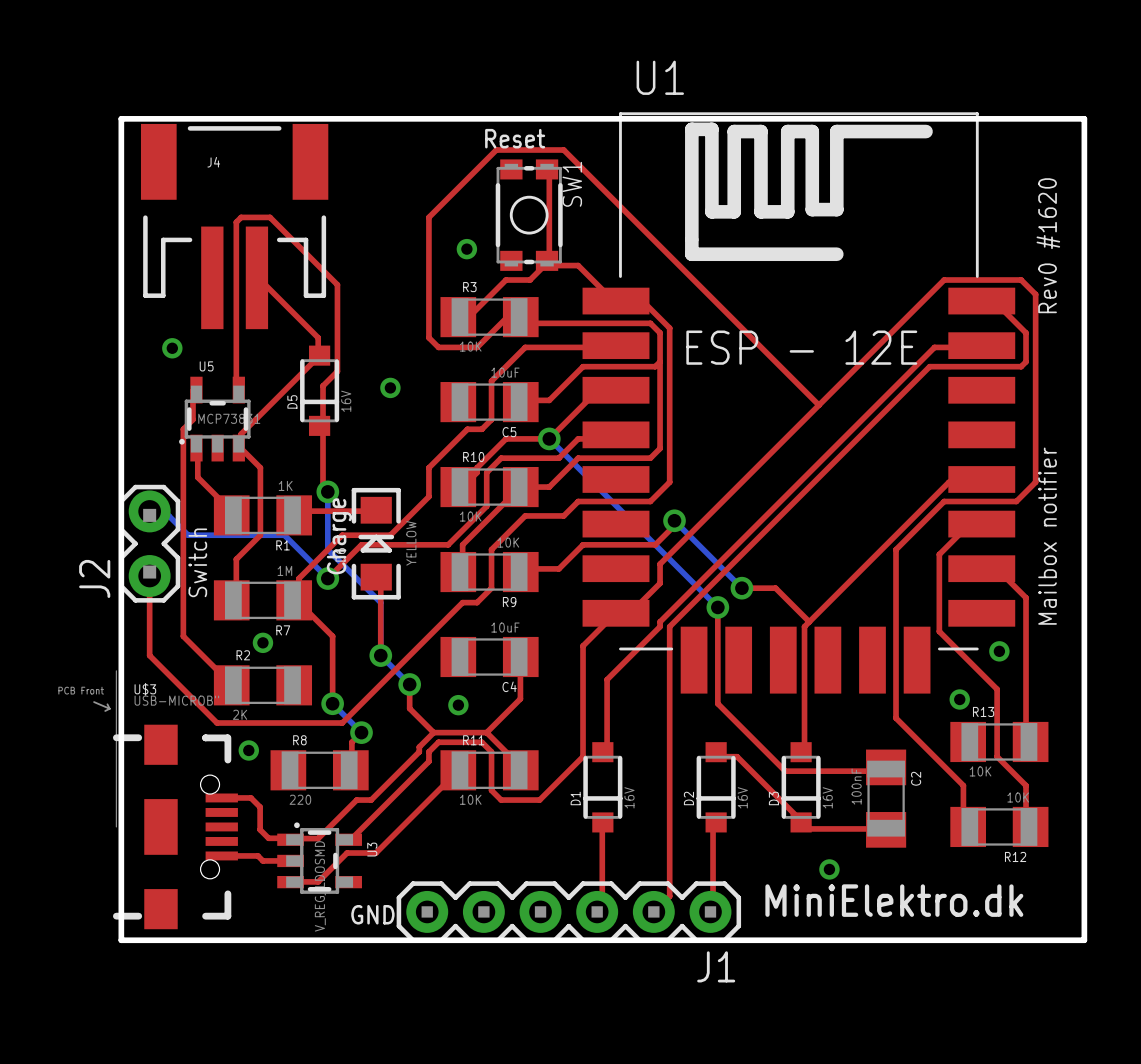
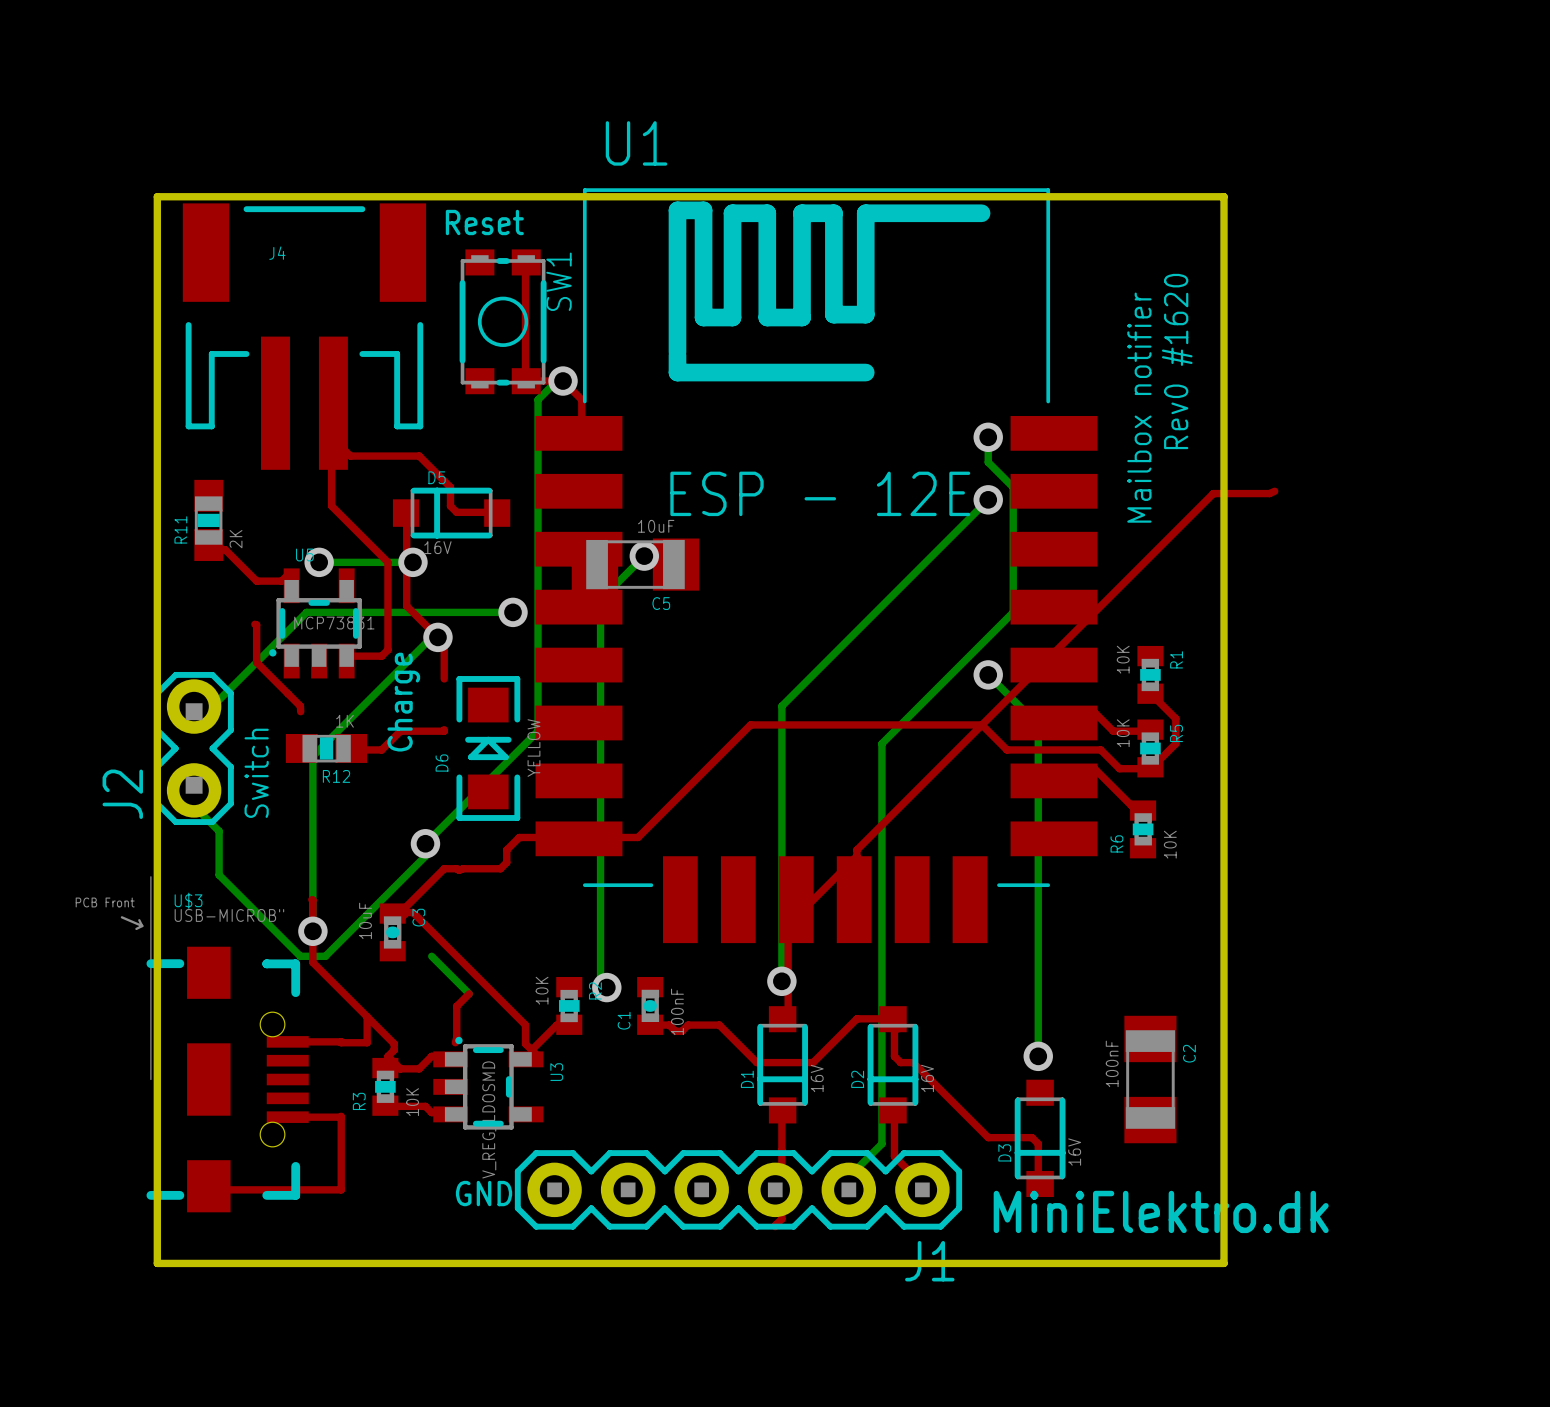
board edge: (942, 118) (1084, 118) (1084, 940) (942, 940) -> (1224, 196) (1224, 1263)
text position: Reset (515, 138) -> Reset (484, 222)
top track: none -> (526, 262) (525, 381) (563, 381) (581, 399) (581, 431) (579, 433)
top track: (547, 169) (549, 174) (549, 260) (547, 260) -> none
SW1 position: (529, 215) -> (503, 321)
text position: Rev0 #1620 (1048, 245) -> Rev0 #1620 (1177, 361)
via: (466, 249) -> none
bottom track: none -> (563, 381) (556, 381) (538, 399) (538, 731) (425, 843) (425, 856) (325, 956) (300, 956) (219, 875) (219, 831) (194, 806) (194, 790)
via: none -> (563, 381)
top track: (547, 260) (549, 265) (578, 265) (611, 299) (616, 301) (616, 304) (645, 304) (669, 328) (669, 482) (650, 501) (578, 501) (563, 515) (525, 515) (491, 549) (491, 588) (477, 602) (462, 602) (342, 723) (217, 723) (149, 655) (149, 576) -> none
top track: (547, 260) (530, 280) (505, 280) (472, 313) (462, 313) (458, 317) -> none
top track: none -> (333, 403) (344, 449) (331, 462) (331, 506) (387, 562) (387, 649) (381, 656) (350, 656) (346, 661)
top track: (260, 280) (318, 337) (319, 355) (241, 434) (241, 443) (238, 448) (260, 467) (260, 535) (236, 559) (236, 597) (231, 600) -> (337, 406) (337, 443) (350, 456) (419, 456) (450, 487) (450, 506) (456, 512) (497, 513)
R3 footprint: [440, 297, 539, 338] -> [372, 1057, 399, 1116]
top track: (981, 301) (982, 304) (997, 304) (1026, 332) (1026, 361) (1021, 366) (929, 366) (669, 626) (669, 896) (653, 911) -> none
bottom track: none -> (988, 437) (988, 462) (1013, 487) (1013, 612) (881, 743) (881, 1143) (850, 1175) (850, 1187) (848, 1189)
via: none -> (988, 437)
top track: (616, 345) (611, 347) (525, 347) (491, 381) (491, 419) (481, 429) (467, 429) (428, 467) (428, 496) (390, 535) (342, 535) (298, 578) (298, 597) (294, 600) (298, 602) (332, 636) (332, 703) -> none
via: (172, 348) -> none
bottom track: none -> (988, 499) (781, 706) (781, 981)
via: none -> (988, 499)
top track: (660, 361) (655, 366) (583, 366) (549, 400) (520, 402) -> none
top track: none -> (405, 513) (406, 606) (444, 643) (444, 678)
top track: none -> (208, 545) (212, 549) (225, 549) (256, 581) (281, 581) (287, 574) (294, 581) (291, 585)
via: (390, 387) -> none
top track: (196, 390) (192, 390) (192, 419) (183, 429) (183, 636) (231, 685) -> none
top track: (238, 390) (236, 385) (236, 222) (241, 217) (270, 217) (337, 284) (337, 371) (323, 385) (323, 424) (319, 425) (323, 429) (323, 487) (327, 491) -> none
D5 rotation: 0° (319, 390) -> 90° clockwise (451, 513)
top track: (616, 390) (597, 390) (549, 438) (505, 438) (477, 467) (477, 472) (462, 487) (458, 487) -> none
bottom track: none -> (644, 556) (600, 599) (600, 987) (606, 987)
bottom track: none -> (319, 562) (412, 562)
via: none -> (319, 562)
via: none -> (412, 562)
U1 position: (798, 402) -> (816, 565)
top track: (818, 405) (563, 150) (496, 150) (428, 217) (428, 337) (438, 347) (477, 347) (505, 318) (520, 317) (530, 323) (650, 323) (660, 332) (660, 448) (650, 458) (578, 458) (549, 487) (520, 487) (462, 544) (462, 568) (458, 572) -> none
U5 position: (214, 419) -> (315, 623)
top track: (616, 434) (611, 438) (578, 438) (558, 458) (501, 458) (486, 472) (486, 506) (448, 544) (361, 544) (327, 578) -> none
via: none -> (513, 612)
bottom track: (549, 438) (717, 607) -> none
via position: (549, 438) -> (644, 556)
bottom track: none -> (437, 637) (431, 637) (312, 756) (312, 931)
top track: (981, 479) (977, 482) (948, 482) (804, 626) (804, 751) (801, 752) -> none
R1 value: 1K (285, 485) -> 10K (1123, 659)
R10: 10K (489, 487) -> none
bottom track: none -> (988, 674) (1038, 724) (1038, 1056)
via: none -> (988, 674)
bottom track: (327, 491) (327, 549) (380, 602) (380, 655) (409, 684) -> none
via position: (327, 491) -> (437, 637)
R1 footprint: [213, 495, 313, 536] -> [1137, 645, 1164, 704]
top track: (376, 510) (298, 511) (294, 515) -> none
bottom track: (149, 511) (149, 515) (168, 515) (188, 535) (284, 535) (327, 578) -> (194, 706) (212, 706) (306, 612) (513, 612)
top track: (674, 520) (674, 525) (655, 544) (583, 544) (558, 568) (525, 568) (520, 572) -> none
bottom track: (674, 520) (741, 588) -> none
via: (674, 520) -> none
top track: none -> (1053, 722) (1063, 712) (1094, 712) (1113, 731) (1150, 729)
top track: (981, 524) (968, 525) (939, 554) (939, 631) (997, 689) (997, 756) (1026, 785) (1026, 824) (1030, 826) -> none
top track: none -> (444, 729) (400, 731) (381, 749) (351, 748)
text position: Charge (339, 536) -> Charge (403, 702)
text position: Mailbox notifier (1047, 536) -> Mailbox notifier (1139, 407)
top track: (905, 540) (944, 501) (1016, 501) (1035, 482) (1035, 294) (1021, 280) (944, 280) (660, 564) (660, 583) (631, 612) (616, 612) (583, 645) (583, 756) (539, 800) (501, 800) (491, 790) (491, 751) (481, 742) (438, 742) (428, 751) (428, 761) (348, 839) -> (1175, 743) (1175, 718) (1150, 693)
R5: none -> 10K (1150, 748)
top track: (896, 549) (896, 718) (963, 785) (963, 824) (968, 826) -> (1163, 756) (1157, 762) (1150, 762) (1150, 767) (1119, 768) (1100, 749) (1006, 749) (981, 724) (750, 724) (638, 837) (519, 837) (506, 850) (506, 862) (500, 868) (458, 870) (444, 868) (400, 912) (392, 913) (394, 918) (400, 918) (406, 912) (412, 912) (525, 1025) (525, 1043) (538, 1056) (531, 1062) (526, 1059)
top track: none -> (1053, 780) (1063, 768) (1094, 768) (1132, 806) (1138, 806) (1143, 810)
top track: (981, 568) (997, 568) (1026, 597) (1026, 737) (1030, 741) -> none
R9: 10K (489, 572) -> none
top track: (376, 577) (380, 578) (380, 655) -> none
via: (327, 578) -> none
top track: (741, 588) (775, 588) (809, 621) -> none
via: (741, 588) -> none
R7: 1M (262, 600) -> none
R6: none -> 10K (1143, 829)
top track: (717, 607) (717, 703) (785, 771) (881, 771) (886, 767) -> none
via: (717, 607) -> none
via: none -> (425, 843)
via: (262, 642) -> none
via: (999, 651) -> none
via: (380, 655) -> none
C4: 10uF (489, 657) -> none
top track: (520, 657) (520, 698) (486, 732) -> none
top track: none -> (311, 899) (312, 962) (394, 1043) (394, 1050) (387, 1056) (400, 1068)
R2 footprint: [213, 665, 313, 706] -> [556, 976, 583, 1035]
via: none -> (312, 931)
top track: (409, 684) (409, 708) (433, 732) -> none
via: (409, 684) -> none
C3: none -> 10uF (392, 932)
via: (959, 699) -> none
via: (332, 703) -> none
via: (458, 705) -> none
R2 value: 2K (240, 714) -> 10K (542, 990)
via: none -> (781, 981)
via: none -> (606, 987)
via: (361, 732) -> none
top track: (433, 732) (419, 747) (419, 751) (371, 800) (356, 800) (318, 838) (268, 838) (260, 829) (260, 807) (250, 797) (221, 797) -> none
top track: (433, 732) (486, 732) -> none
top track: (486, 732) (520, 766) (520, 770) -> none
C1: none -> 100nF (650, 1005)
R13: 10K (999, 741) -> none
via: (248, 750) -> none
top track: none -> (367, 1016) (367, 1042) (287, 1041)
R11 footprint: [440, 750, 539, 791] -> [194, 479, 224, 561]
top track: (716, 752) (717, 756) (737, 756) (809, 828) (886, 829) -> none
top track: none -> (569, 1025) (556, 1025) (531, 1050)
top track: none -> (650, 1025) (669, 1025) (675, 1031) (681, 1031) (688, 1025) (719, 1025) (756, 1062) (813, 1062) (856, 1018) (881, 1018) (888, 1012) (900, 1025) (894, 1031) (894, 1056) (900, 1062) (913, 1062) (988, 1137) (1032, 1137) (1038, 1143) (1038, 1181) (1040, 1183)
R8: 220 (319, 770) -> none
top track: (458, 770) (375, 853) (347, 853) (318, 881) (290, 882) -> none
via: none -> (1038, 1056)
top track: none -> (450, 1059) (450, 1056) (431, 1056) (419, 1068) (385, 1068)
D2 position: (716, 787) -> (892, 1064)
D3 position: (801, 787) -> (1040, 1138)
R12 value: 10K (1018, 797) -> 1K (344, 721)
R11 value: 10K (470, 799) -> 2K (236, 539)
U$3 position: (165, 800) -> (214, 1044)
R12 footprint: [950, 806, 1049, 848] -> [285, 734, 368, 763]
top track: none -> (385, 1105) (425, 1106) (431, 1112) (450, 1112) (450, 1114)
top track: none -> (892, 1110) (894, 1156) (925, 1187) (922, 1189)
top track: (716, 822) (713, 824) (713, 910) (710, 911) -> none
top track: none -> (341, 1116) (341, 1189) (208, 1189) (208, 1186)
top track: none -> (287, 1117) (341, 1117)
top track: (221, 855) (257, 855) (262, 860) (290, 860) -> none
U3 position: (319, 858) -> (488, 1083)
via: (829, 869) -> none
J1 position: (568, 911) -> (738, 1189)
text position: GND (372, 914) -> GND (484, 1193)

